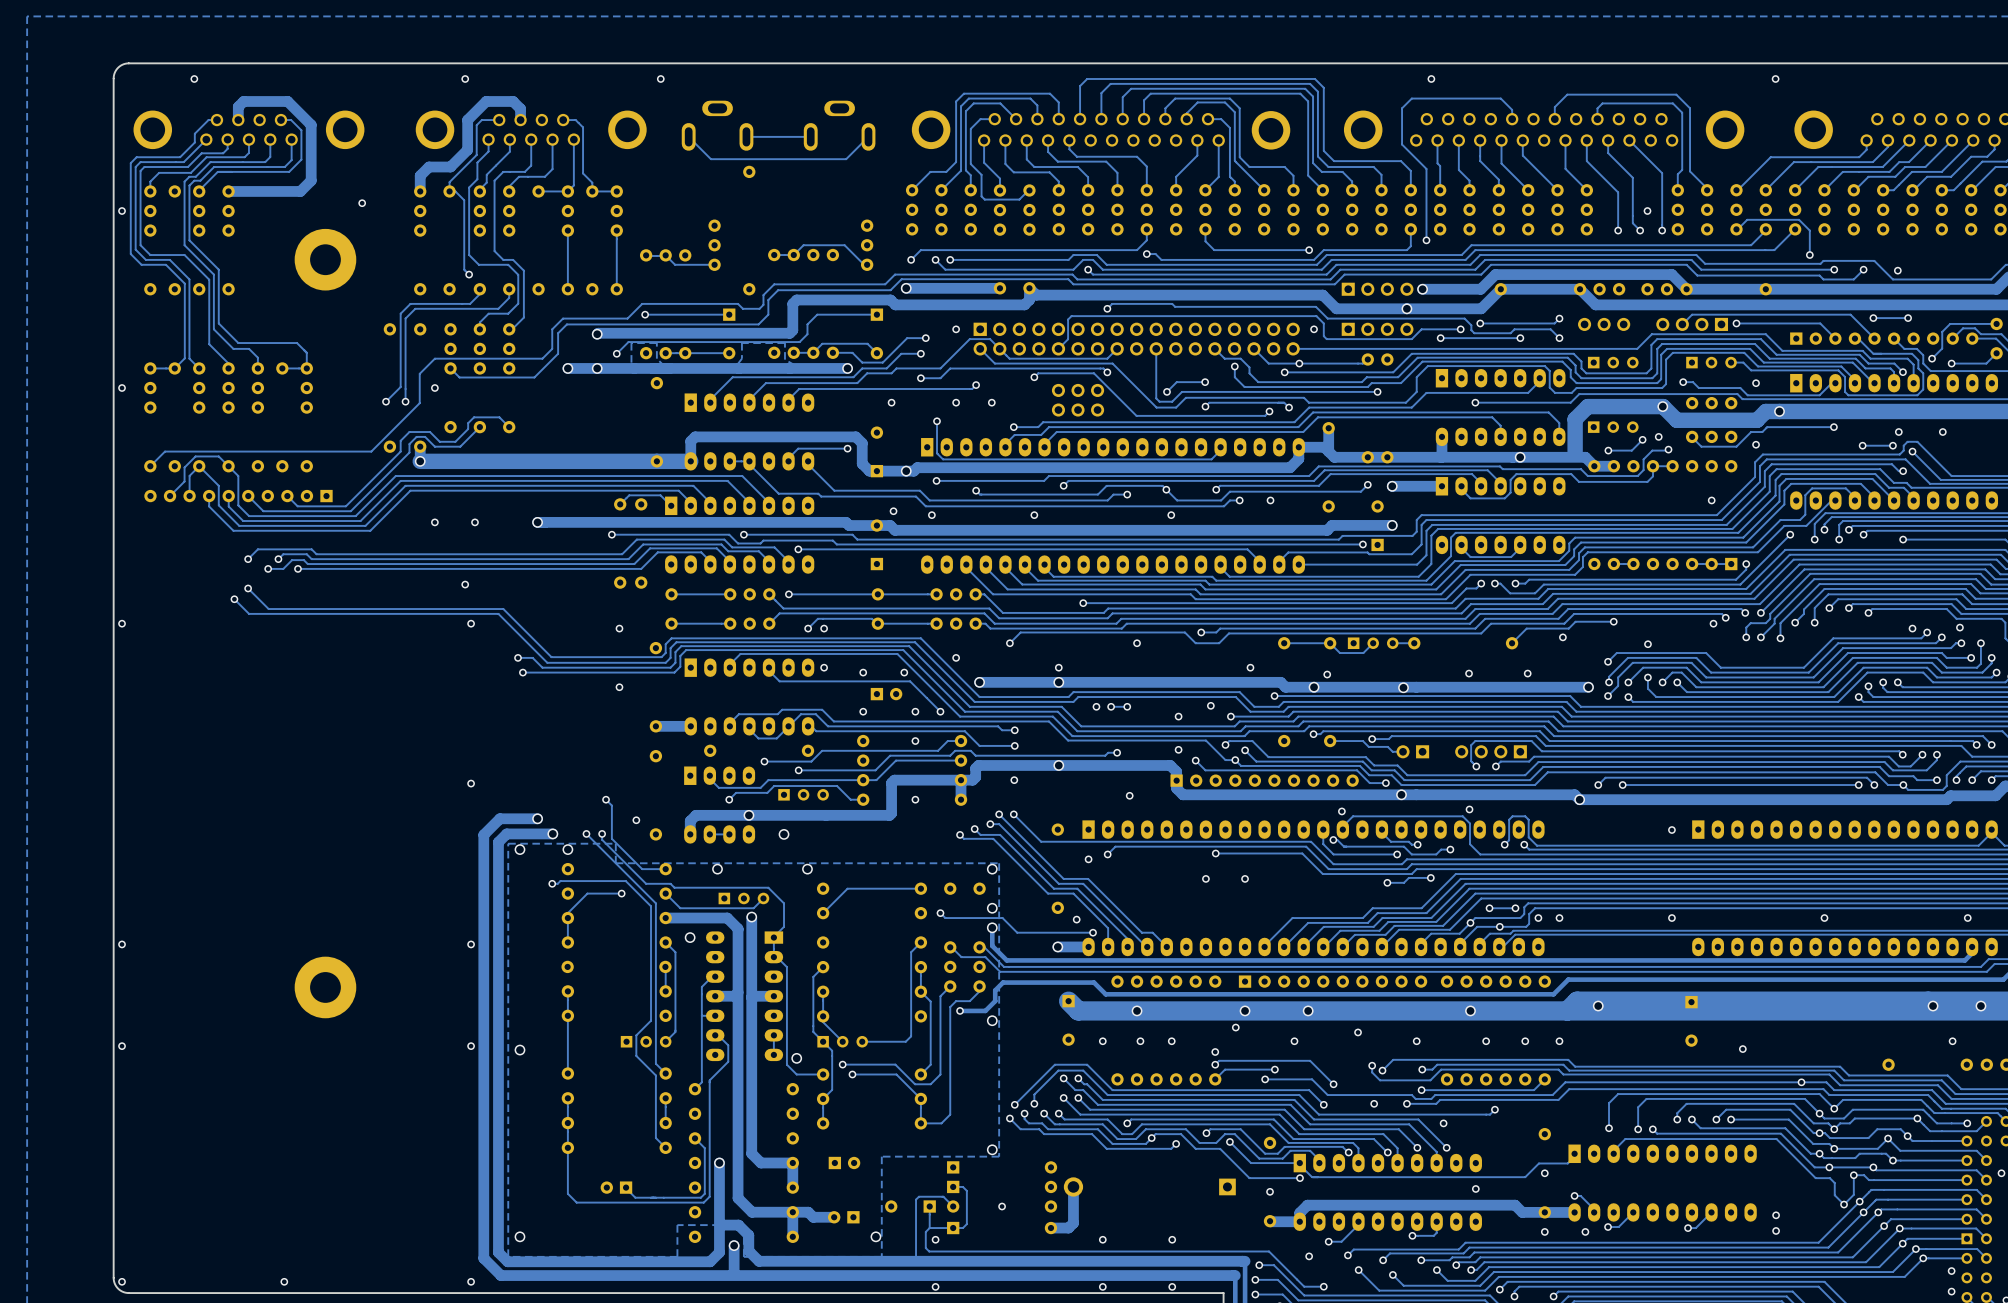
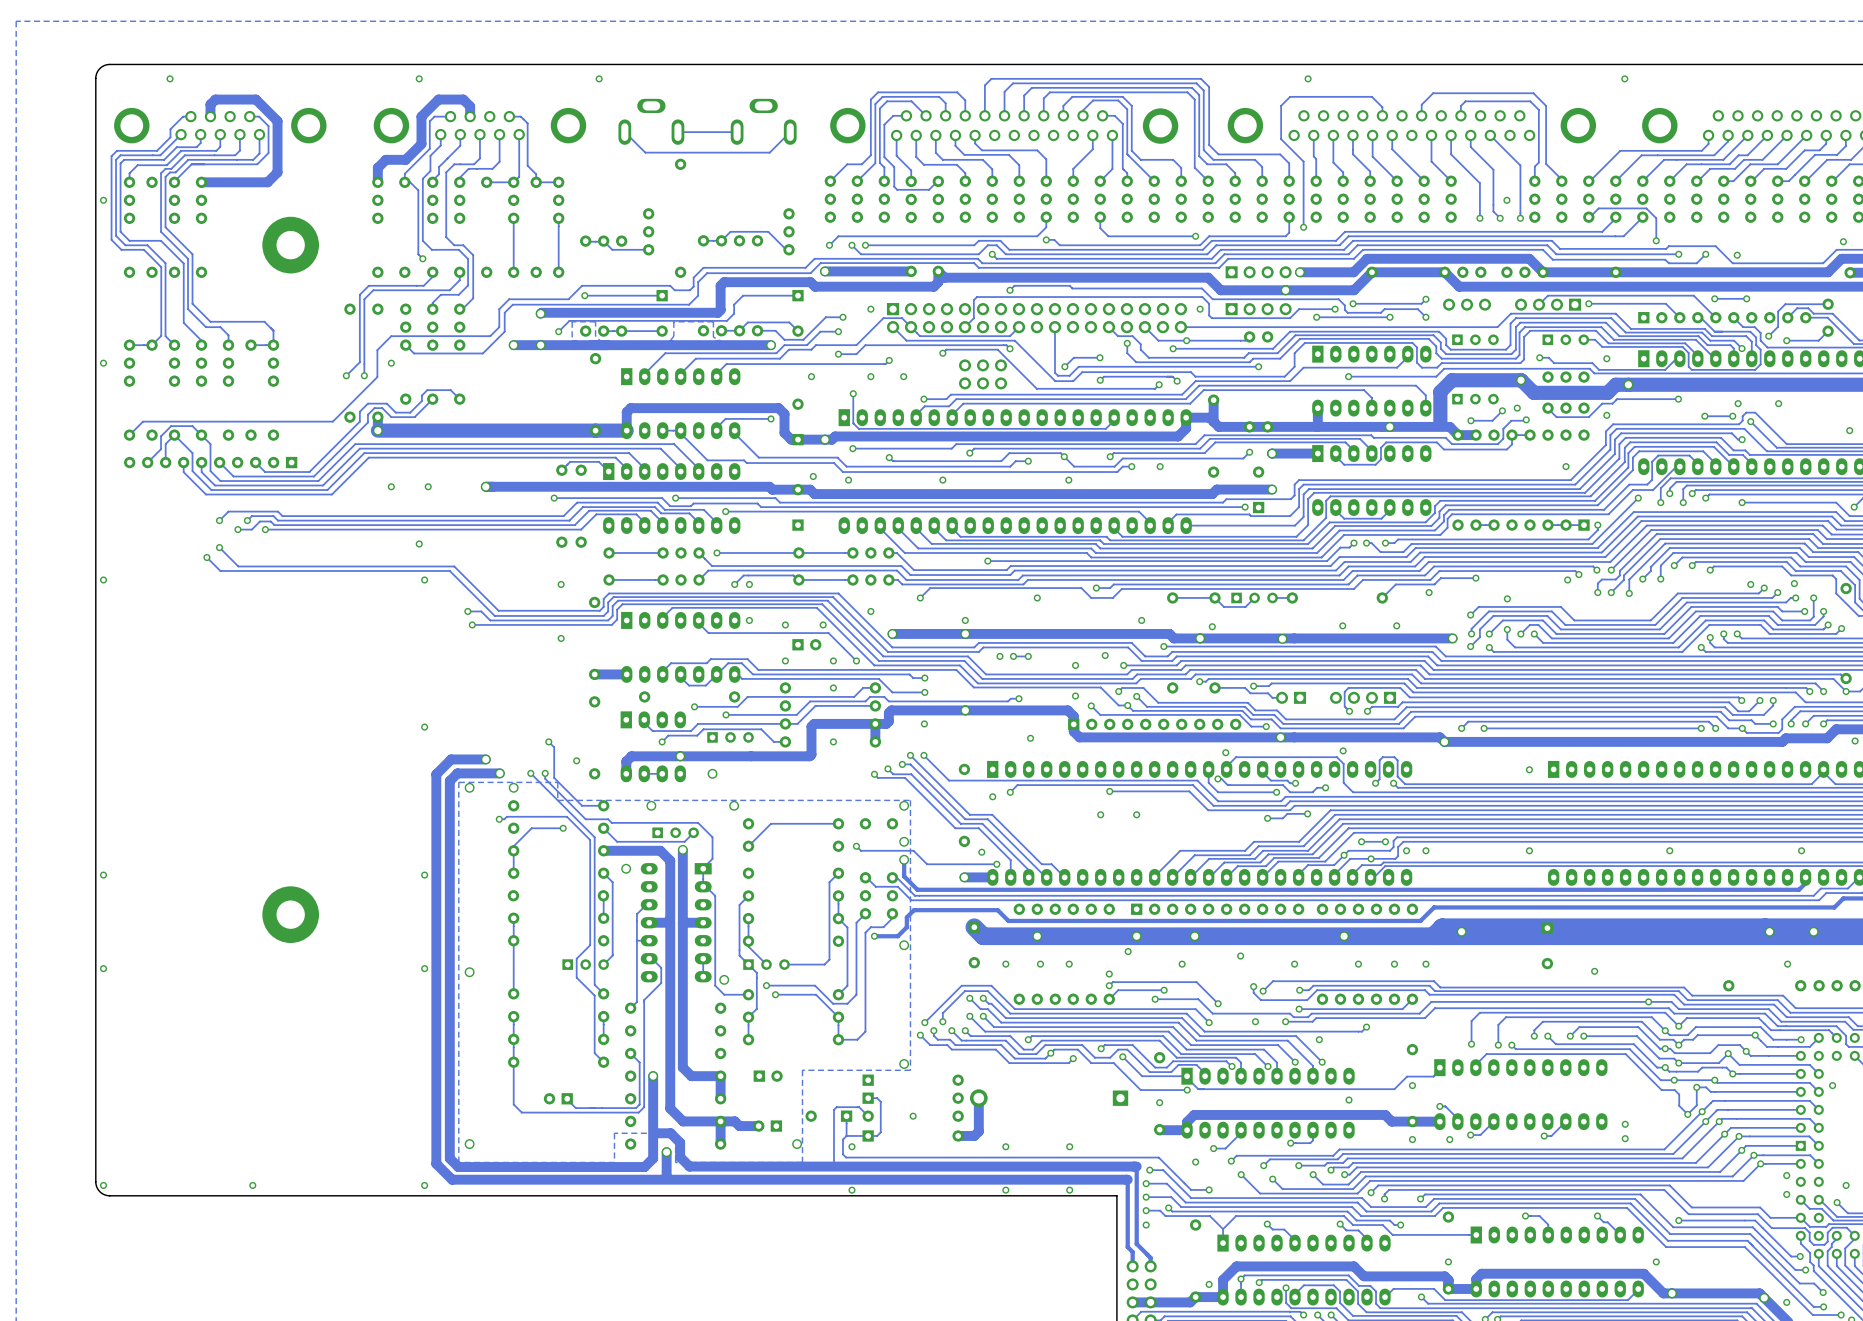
via: (362, 203) -> none

